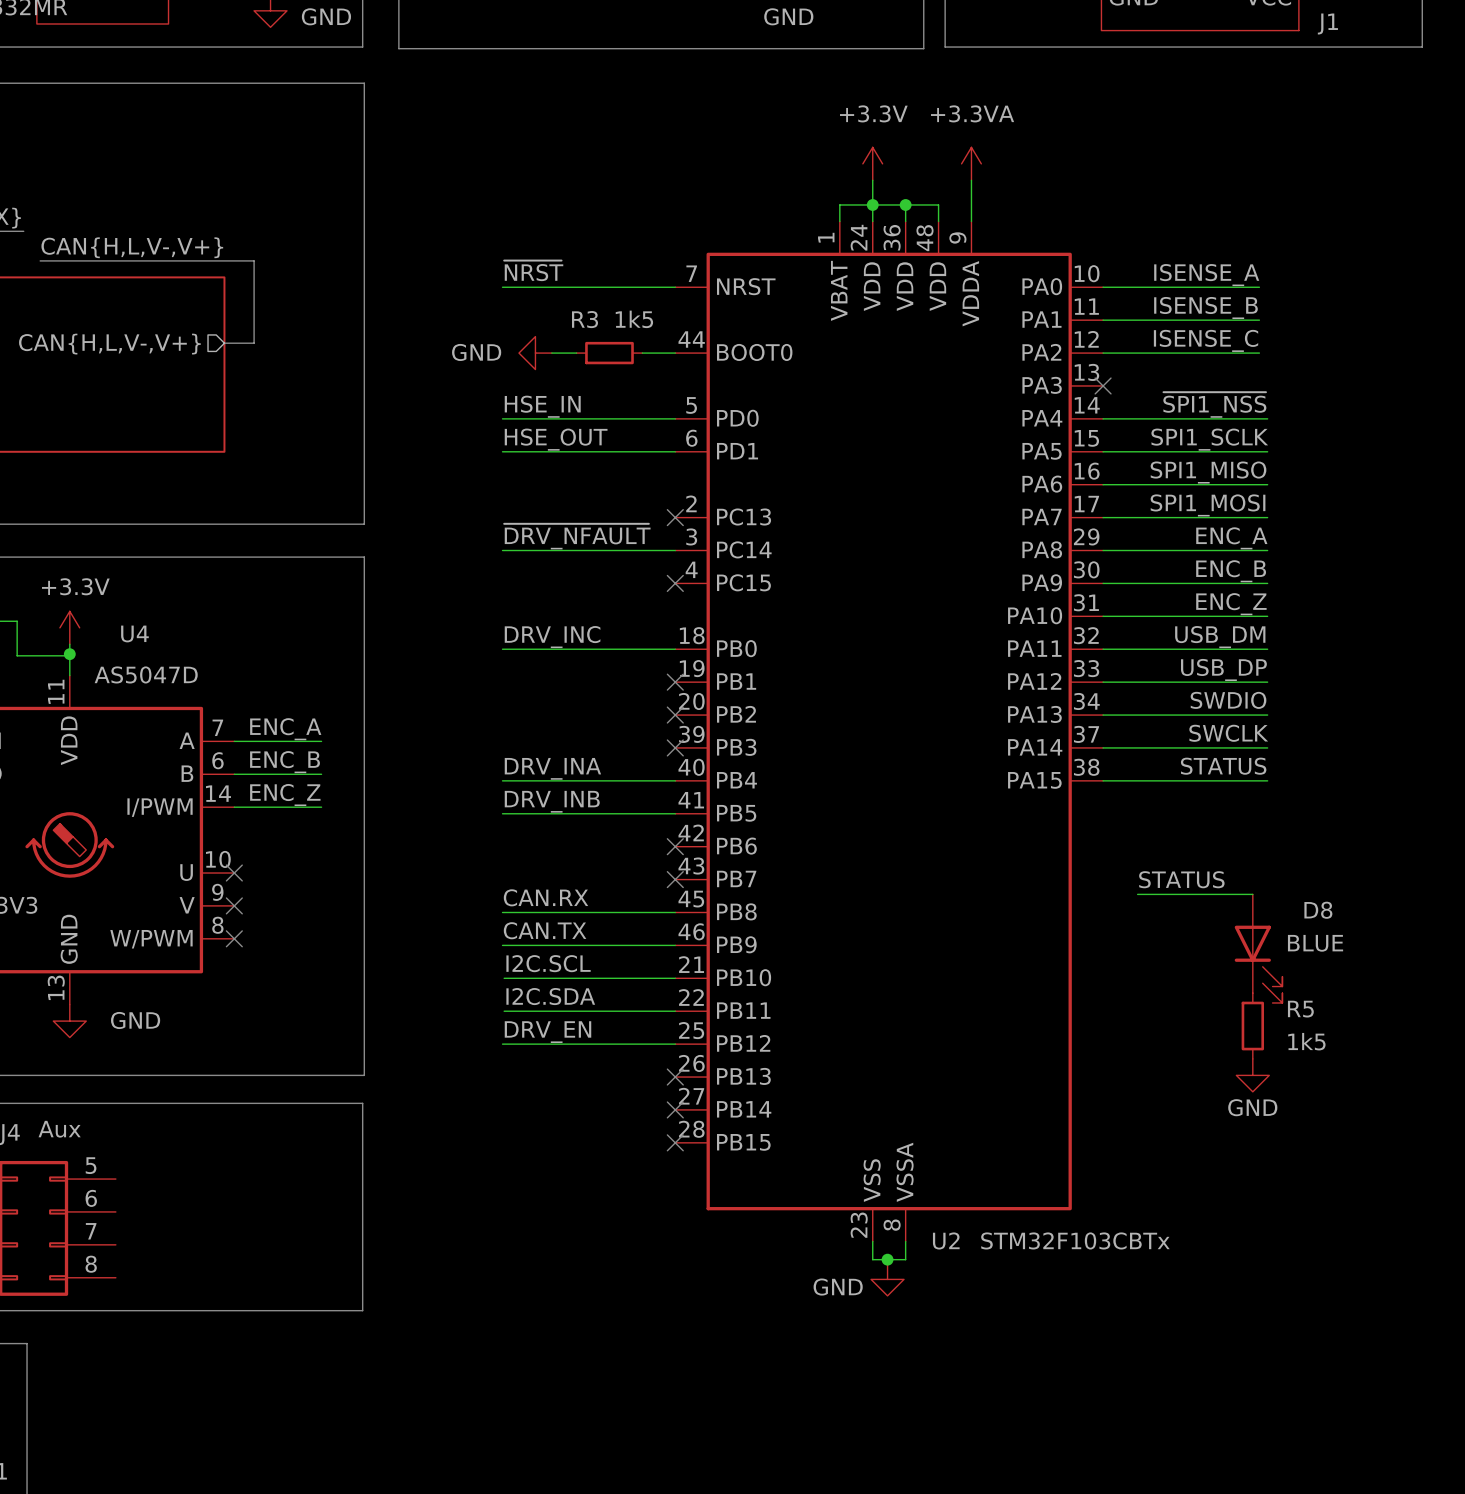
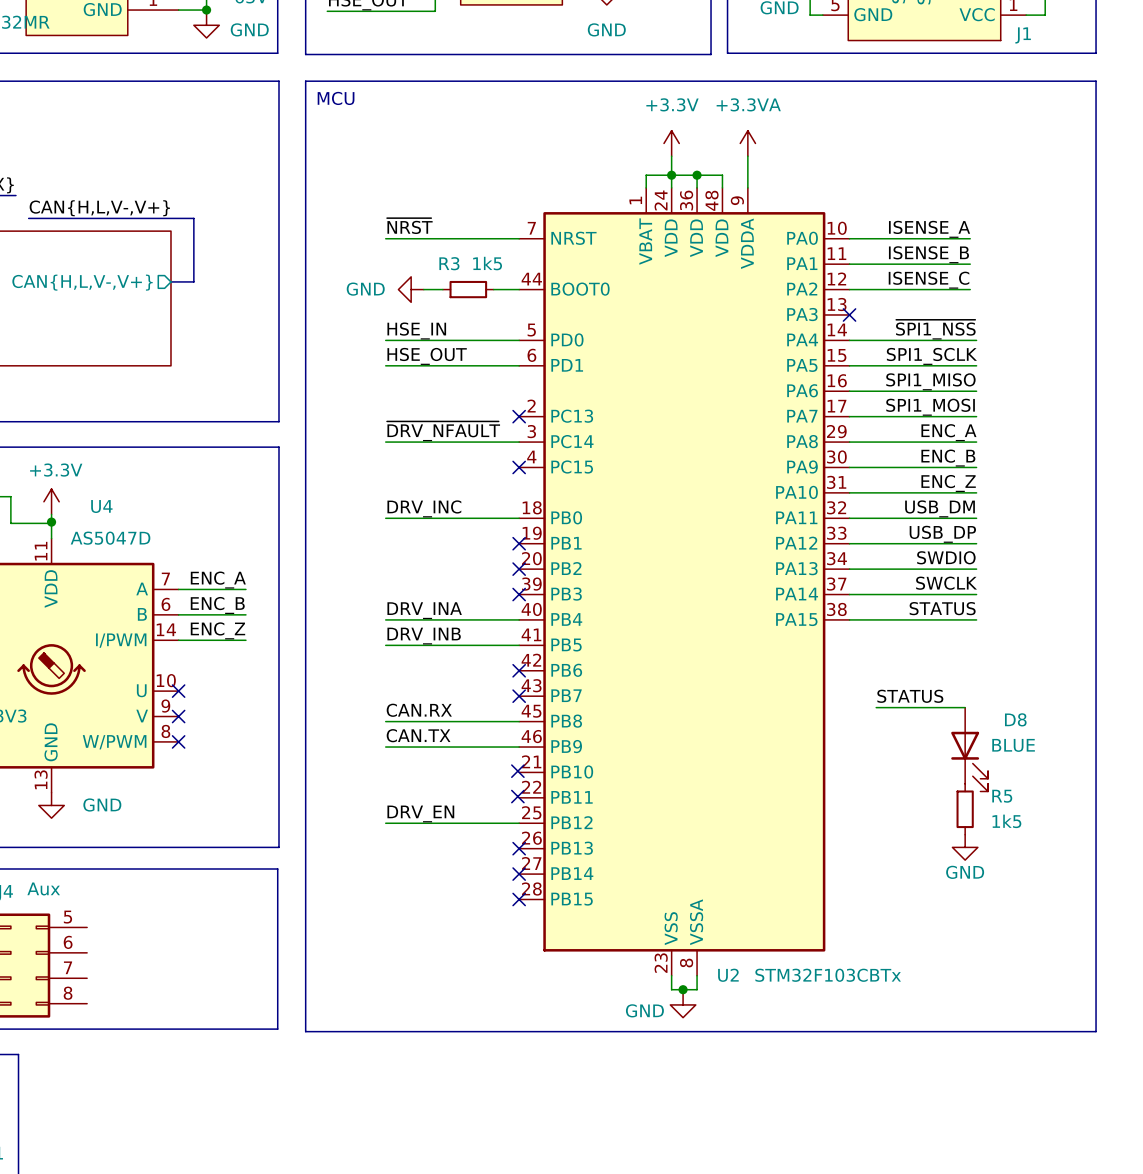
line: none -> (305, 81) (1096, 81) (1096, 1031) (305, 1031) (305, 81)
text: none -> MCU (336, 98)
label: I2C.SCL (548, 963) -> none
no-connect mark: none -> (517, 771)
wire: (504, 978) (675, 978) -> none
label: I2C.SDA (550, 996) -> none
no-connect mark: none -> (517, 796)
wire: (504, 1011) (675, 1011) -> none

